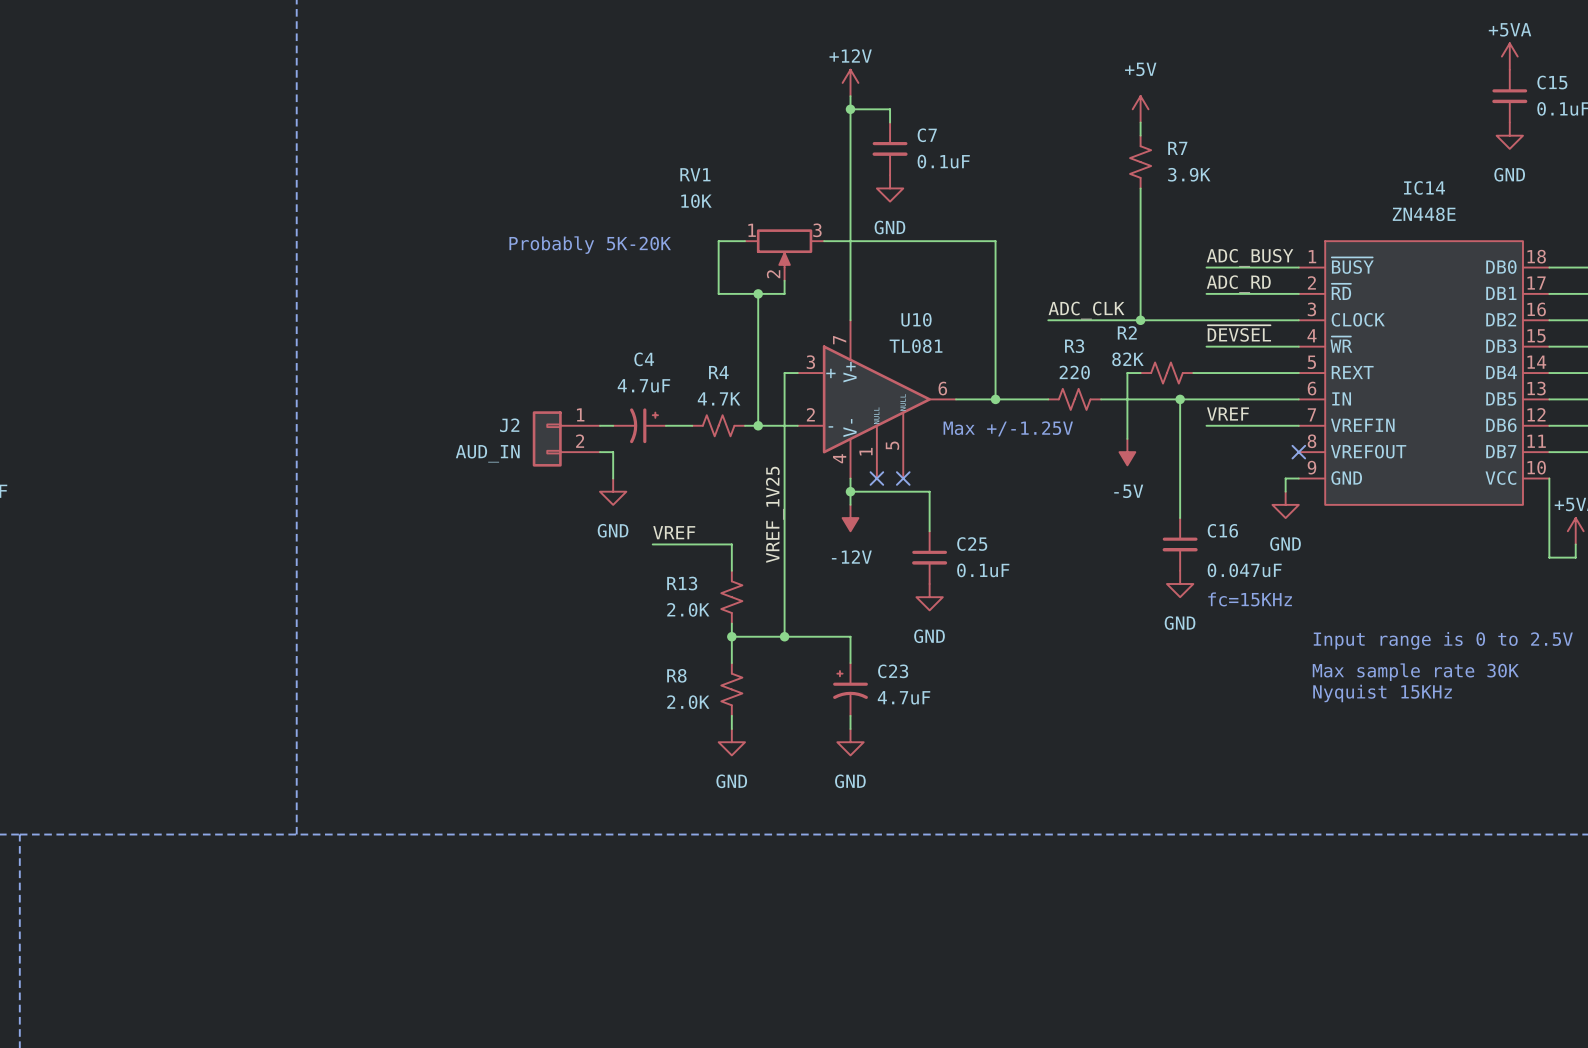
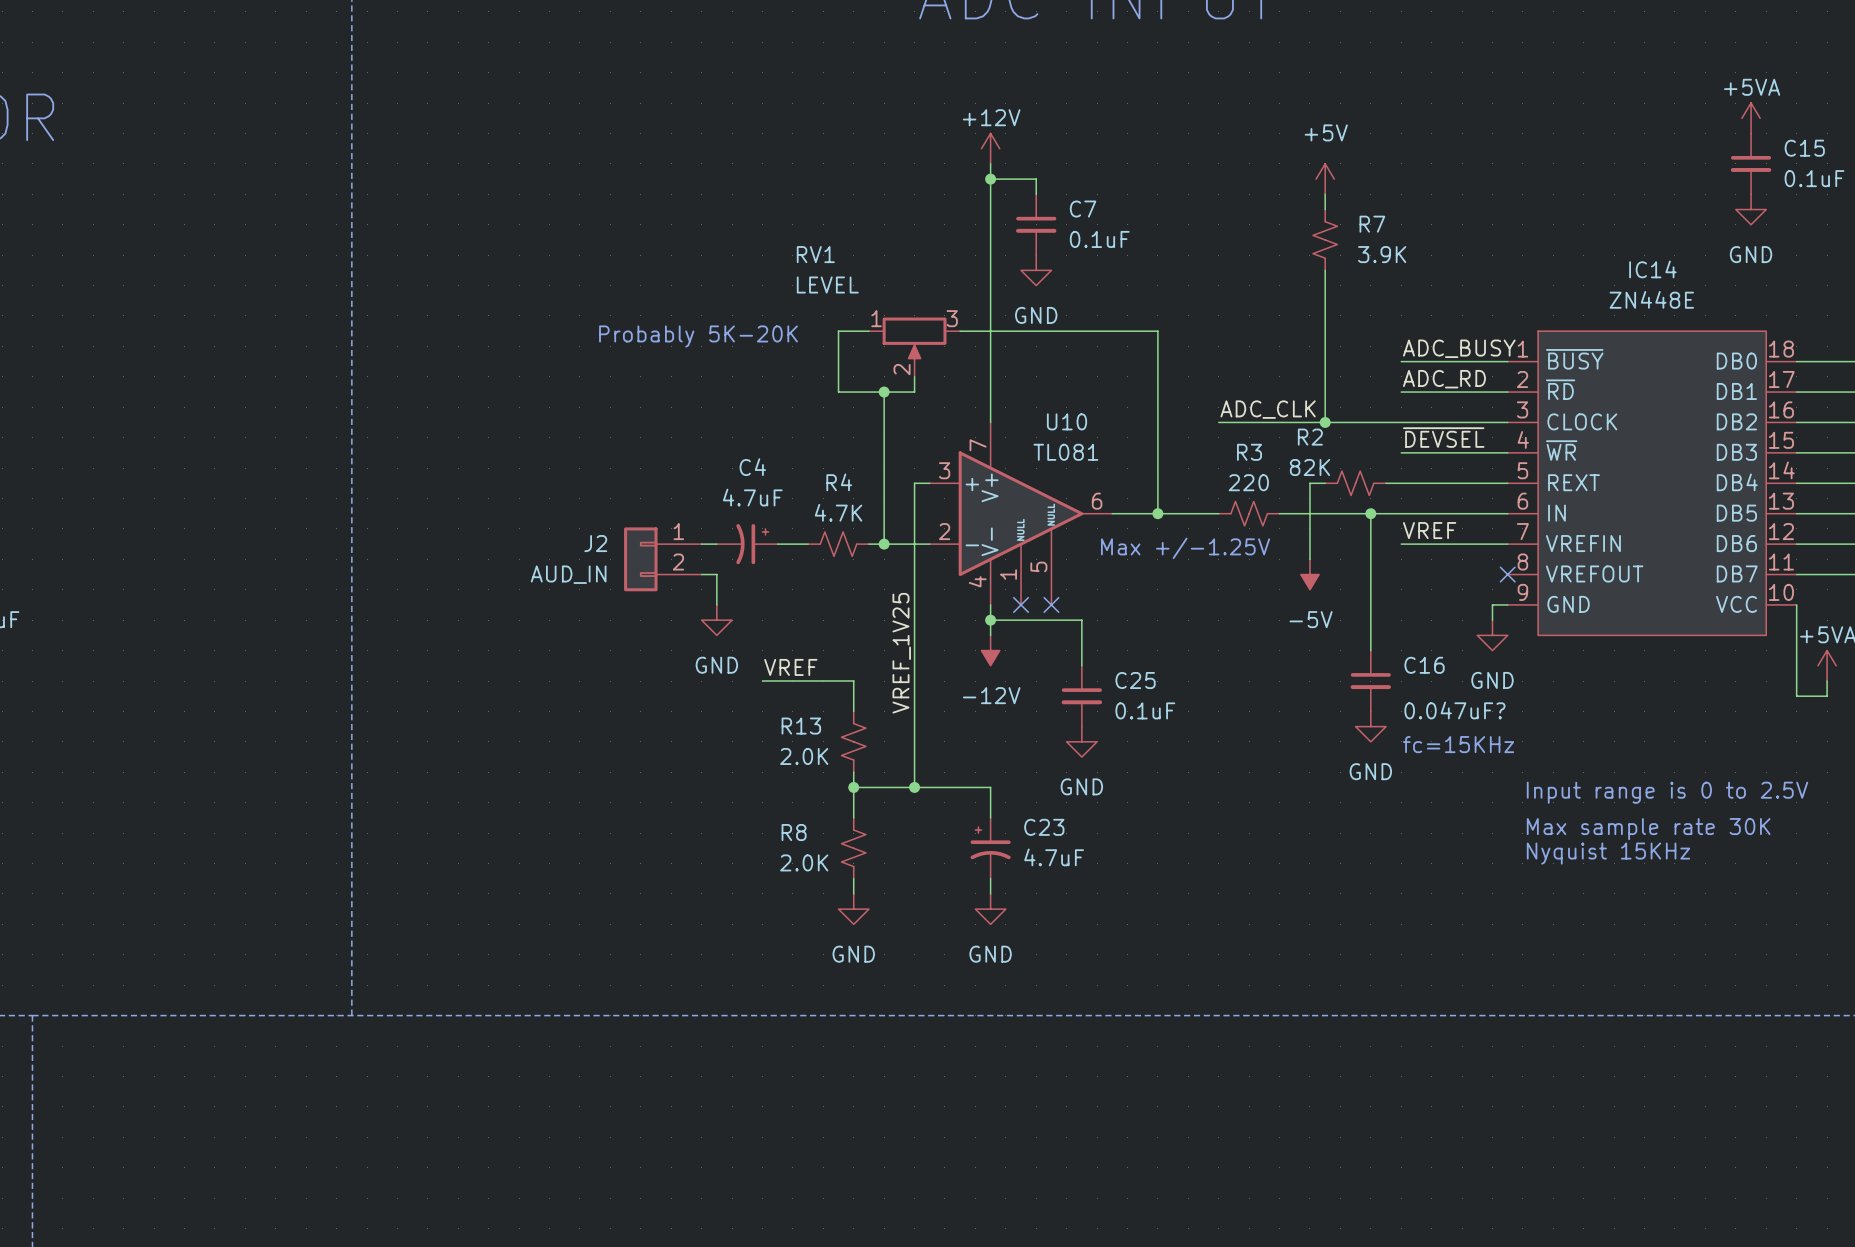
RV1 value: 10K (696, 201) -> LEVEL (827, 285)
C16 value: 0.047uF (1244, 570) -> 0.047uF? (1454, 710)

